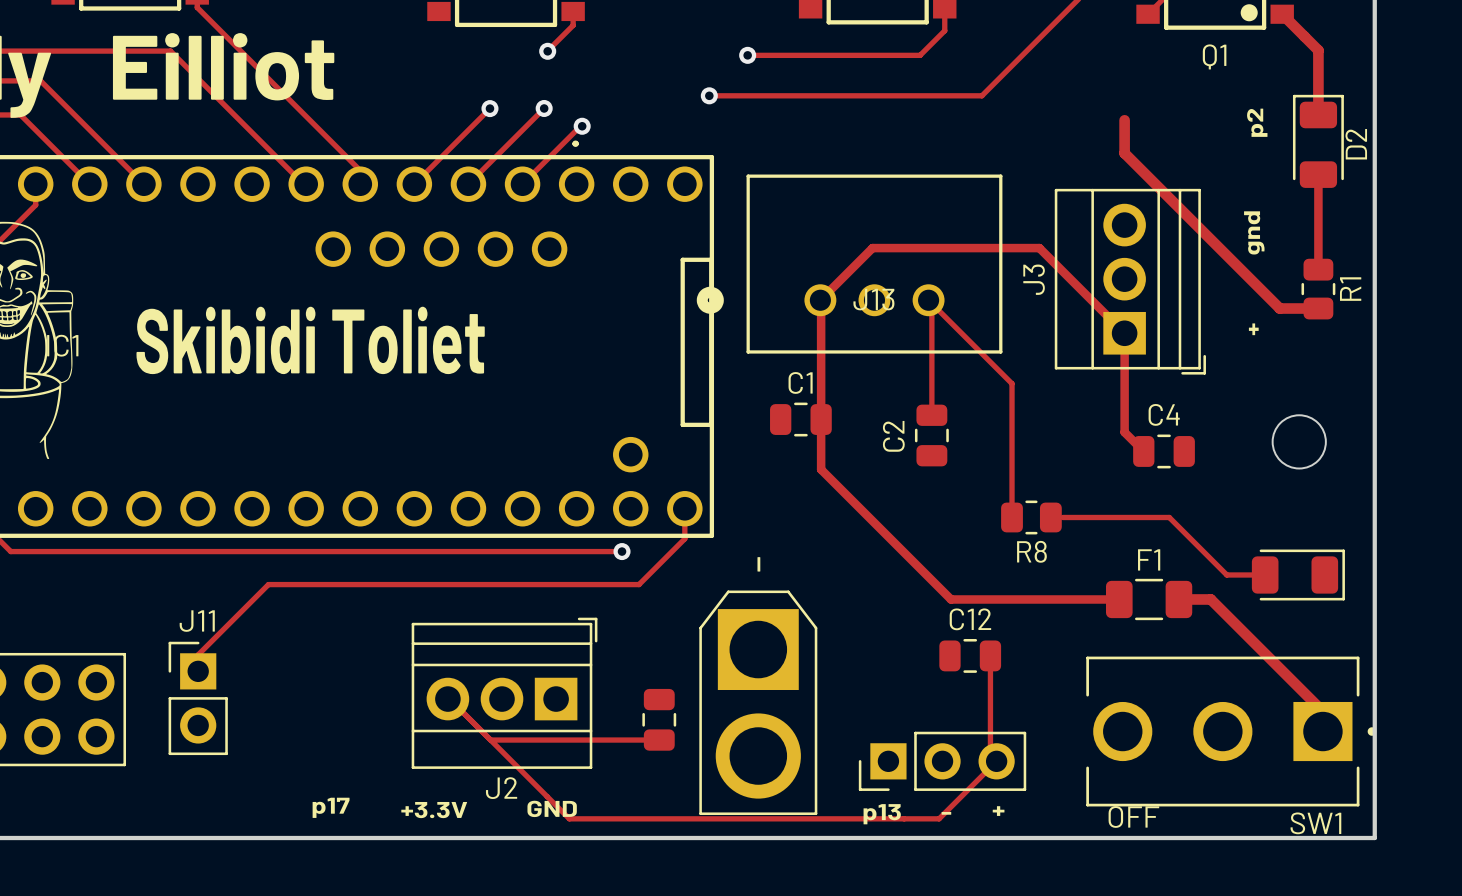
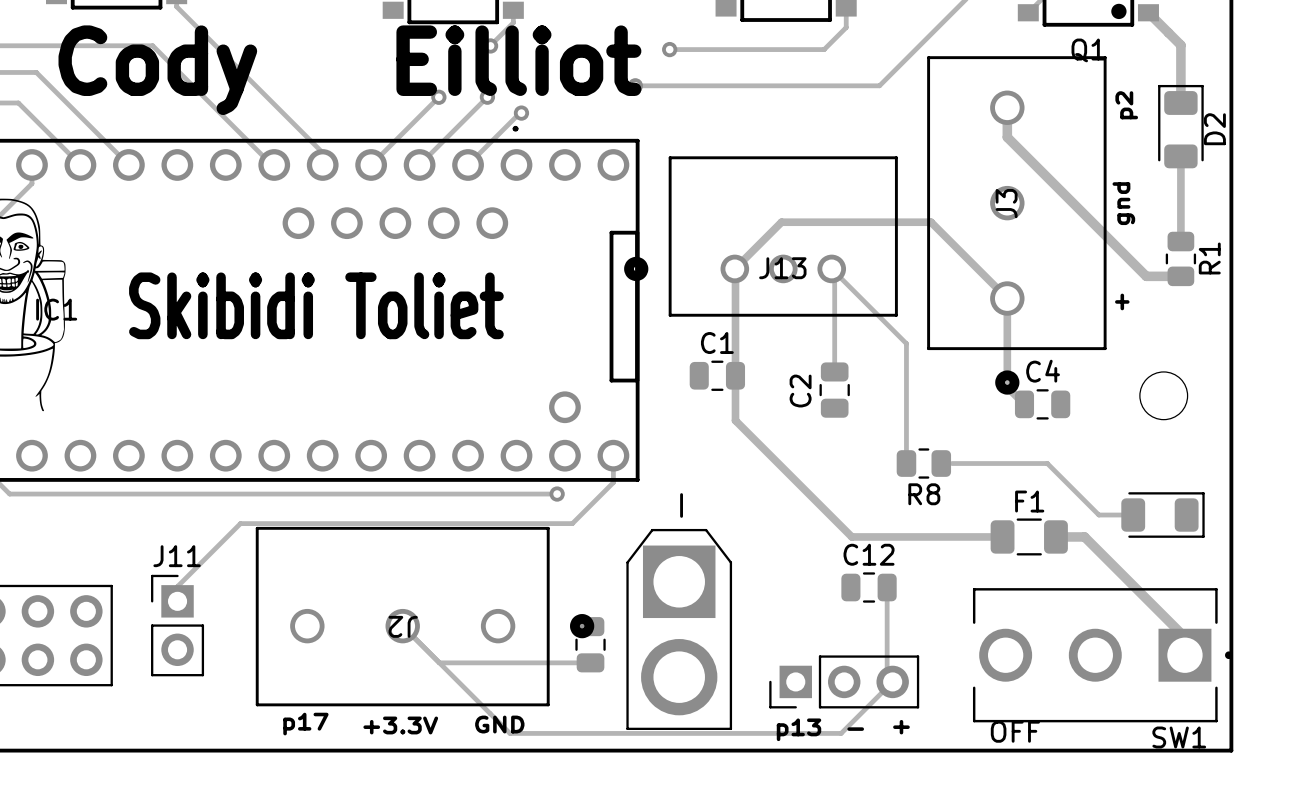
J3 footprint: [1054, 188, 1206, 375] -> [927, 56, 1107, 395]
J3 name position: J3 (1034, 279) -> J3 (1006, 203)
J2 footprint: [411, 617, 598, 769] -> [255, 526, 595, 707]
J2 name position: J2 (501, 788) -> J2 (403, 626)

